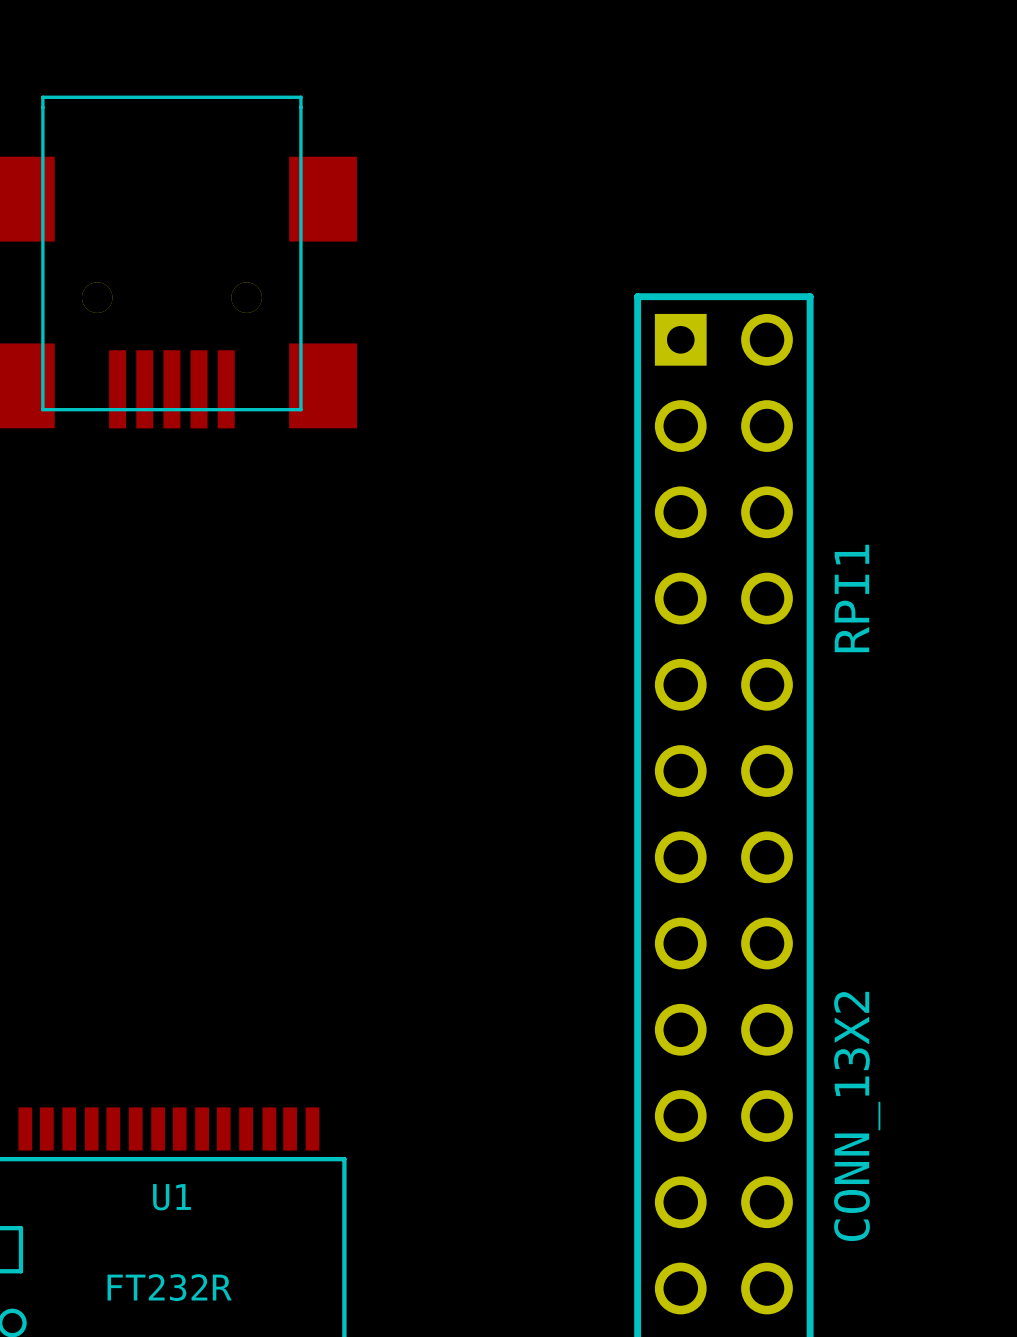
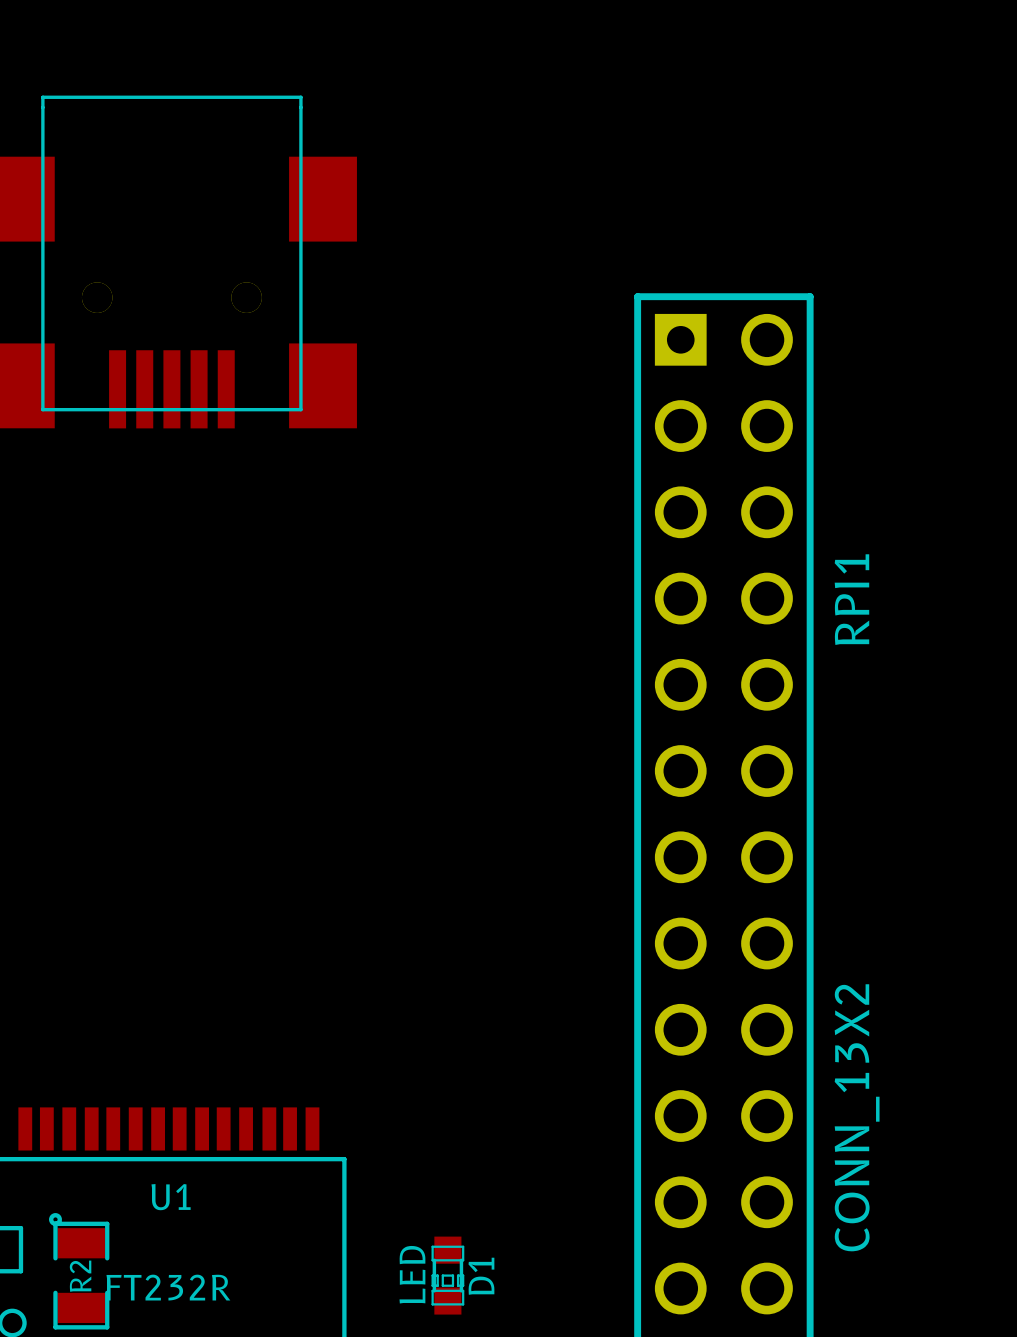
R2: none -> (79, 1271)
D1: none -> LED (447, 1275)

